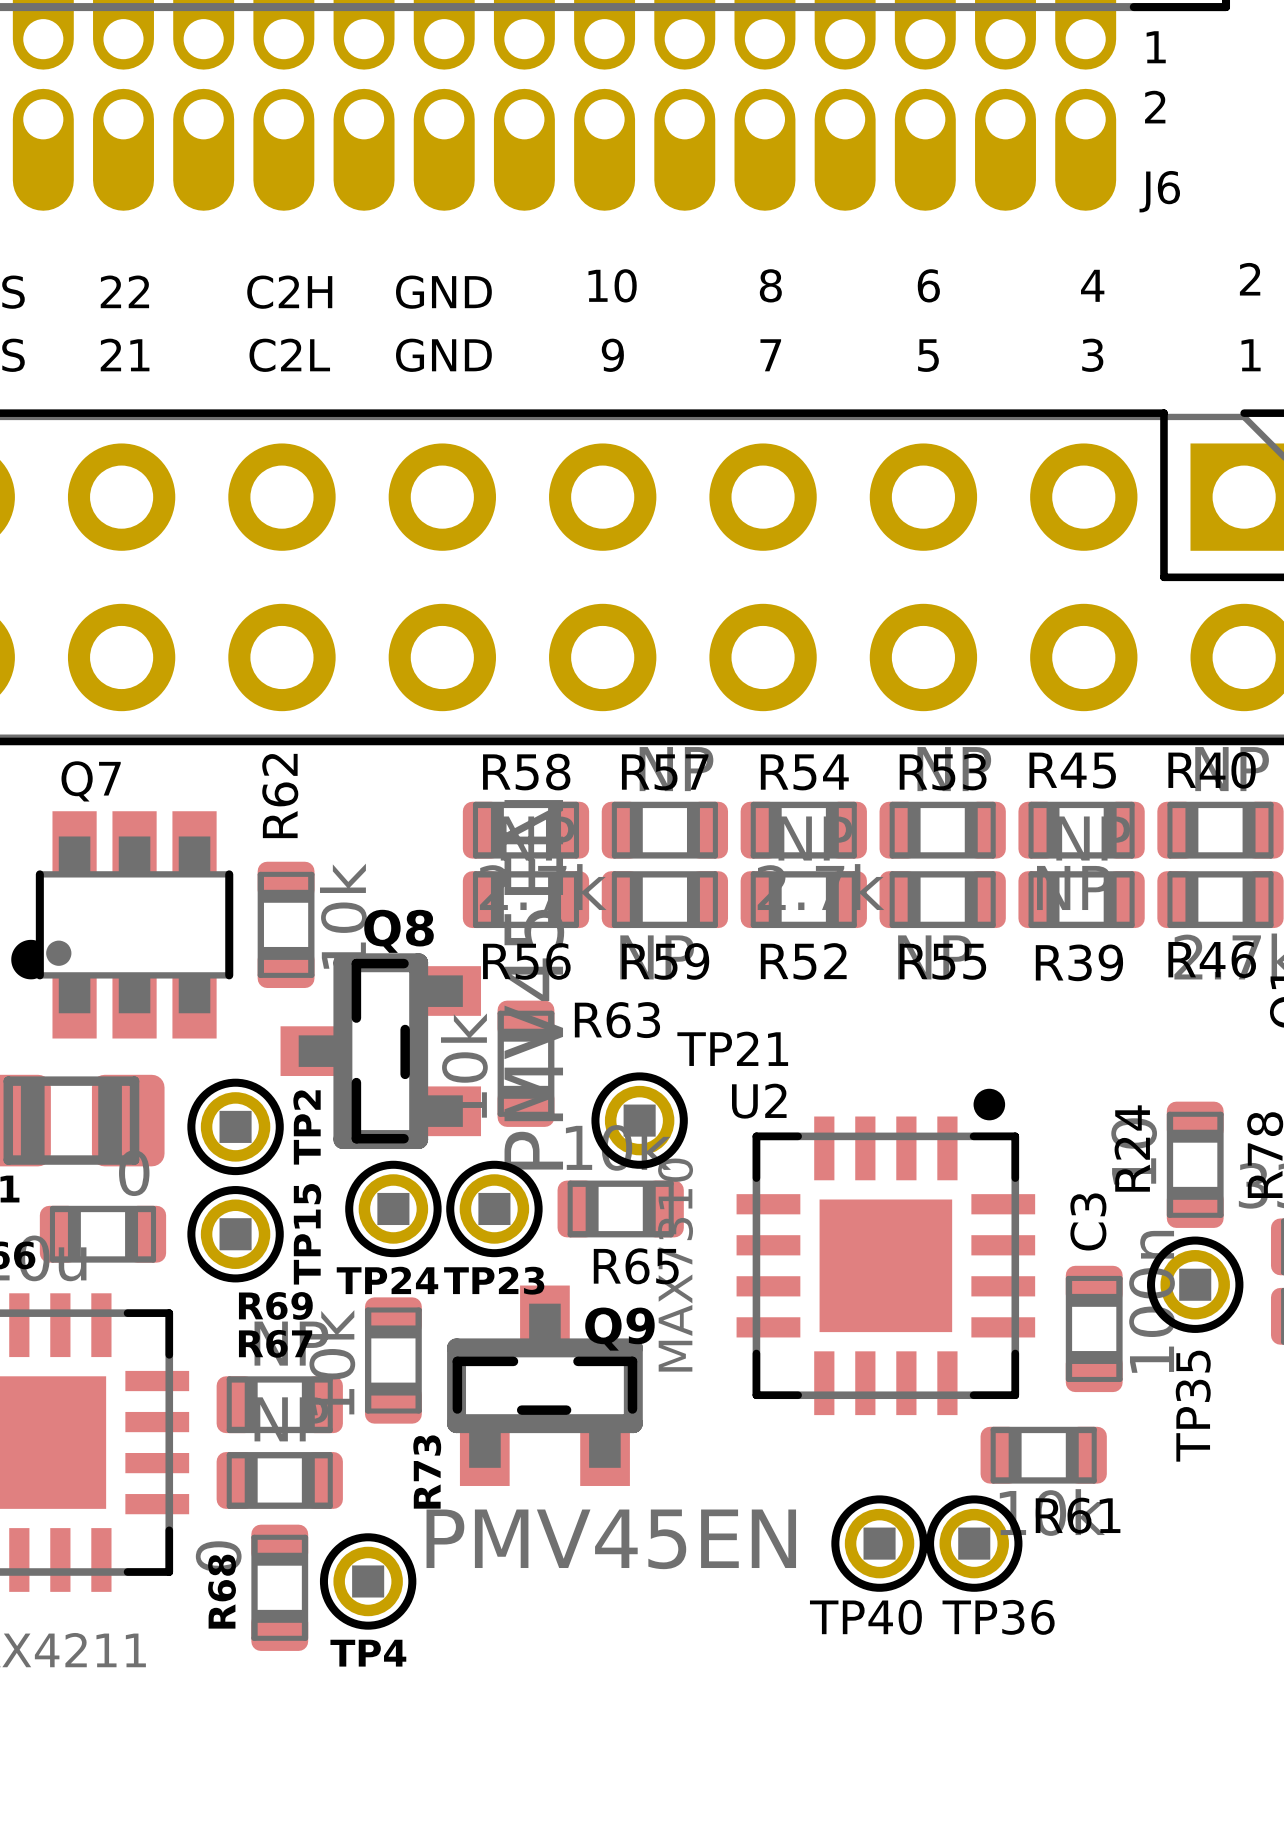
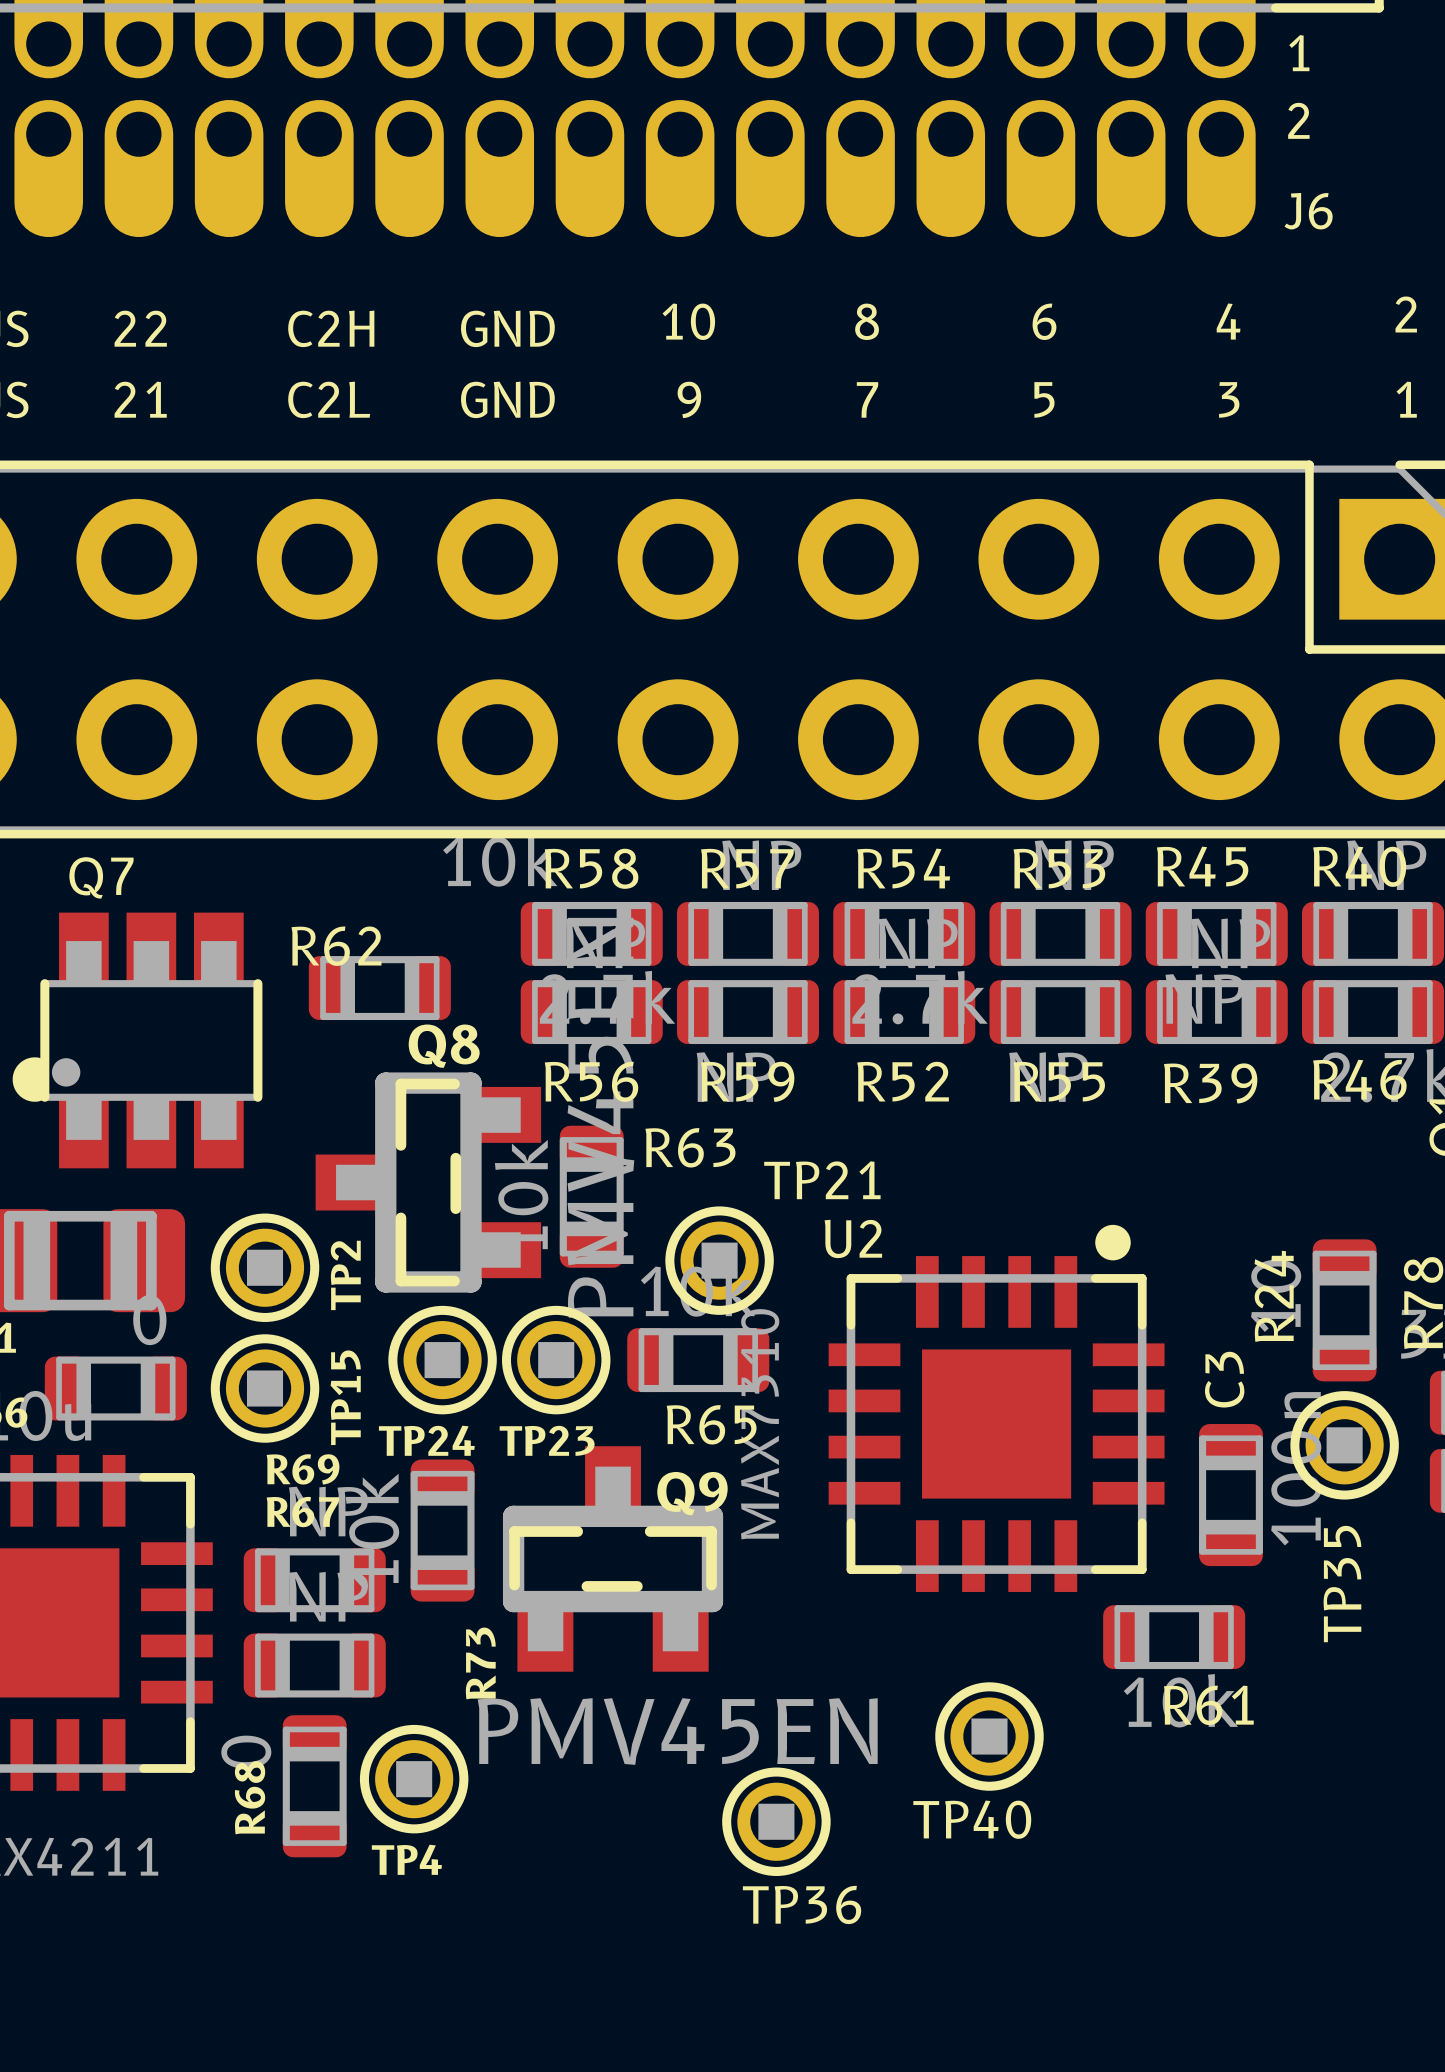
R62 rotation: 0° (286, 924) -> 90° clockwise (379, 988)
TP36 position: (974, 1543) -> (776, 1821)

